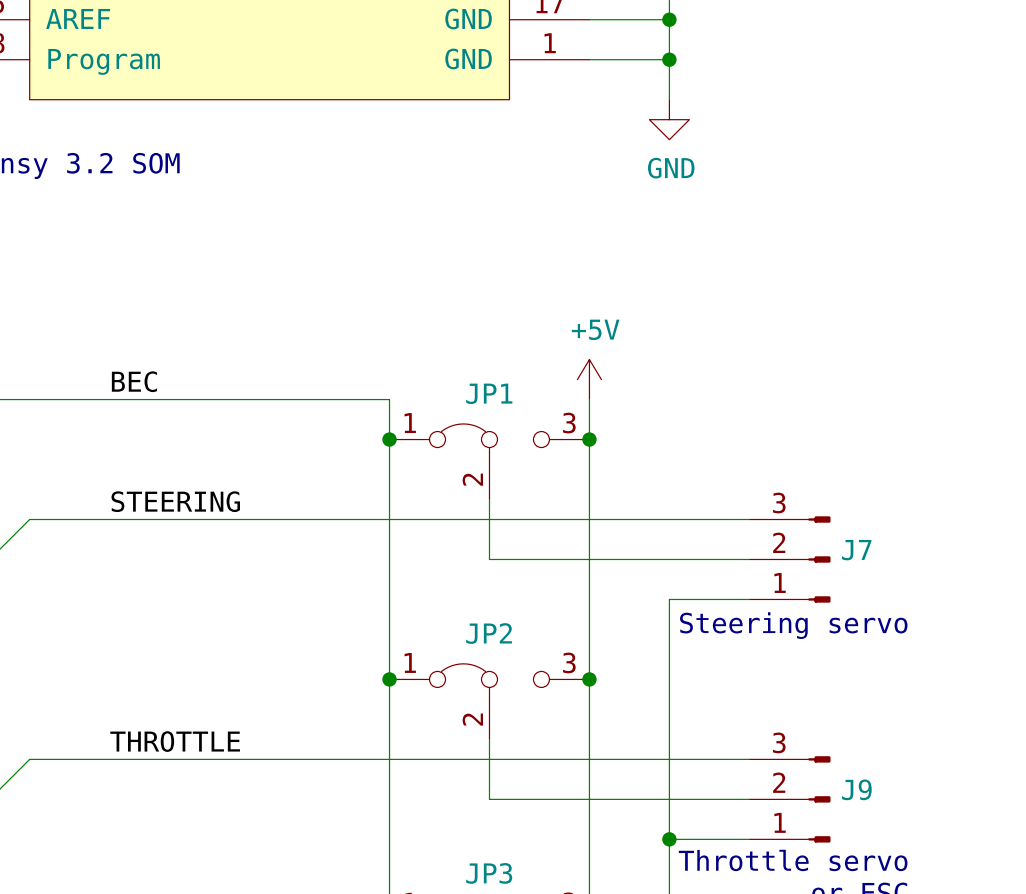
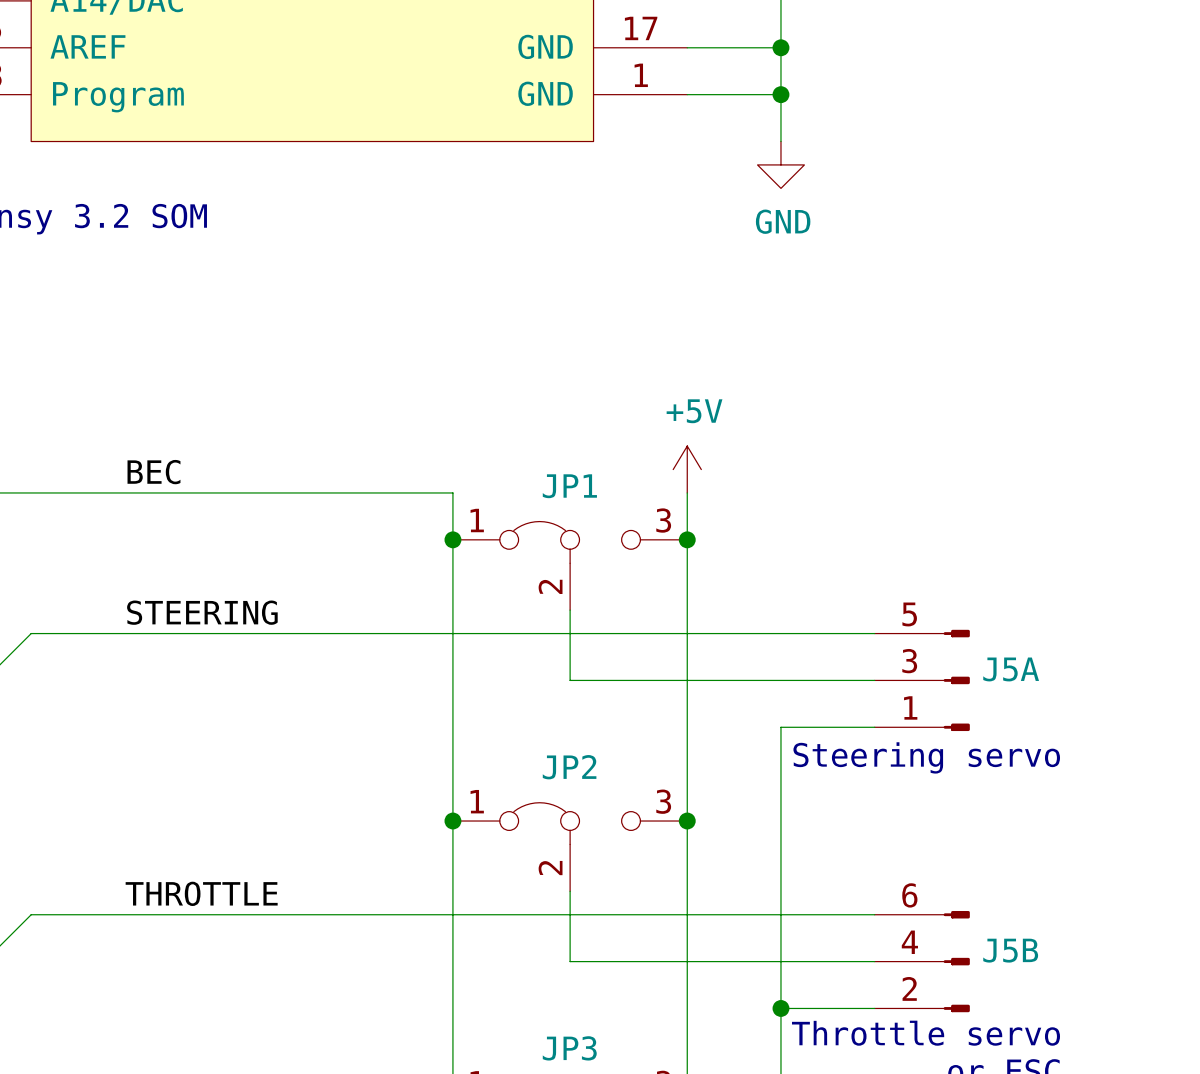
J7 pin number: 3 (779, 503) -> 5 (909, 614)
J7 pin number: 2 (779, 542) -> 3 (909, 661)
J7 name: J7 (856, 550) -> J5A (1011, 669)
J9 pin number: 3 (779, 742) -> 6 (909, 895)
J9 pin number: 2 (779, 782) -> 4 (909, 942)
J9 name: J9 (856, 789) -> J5B (1010, 950)
J9 pin number: 1 (780, 822) -> 2 (909, 988)

